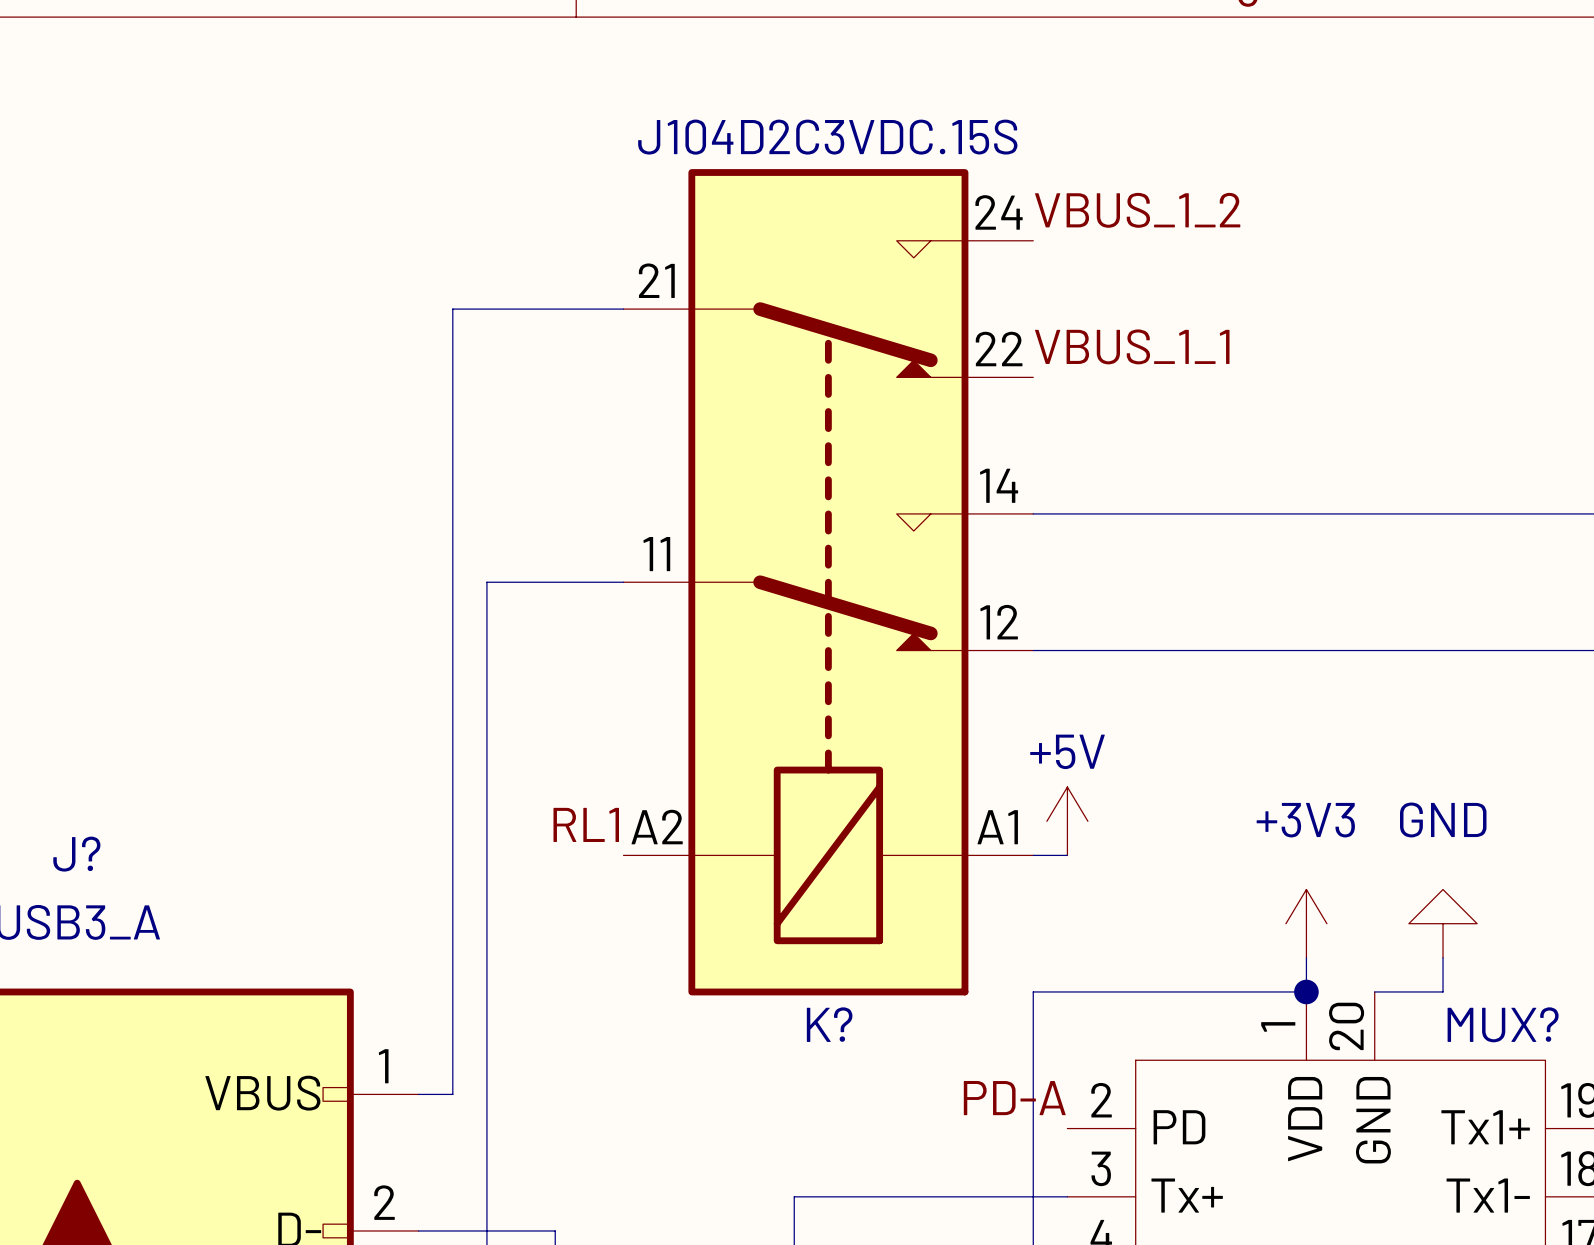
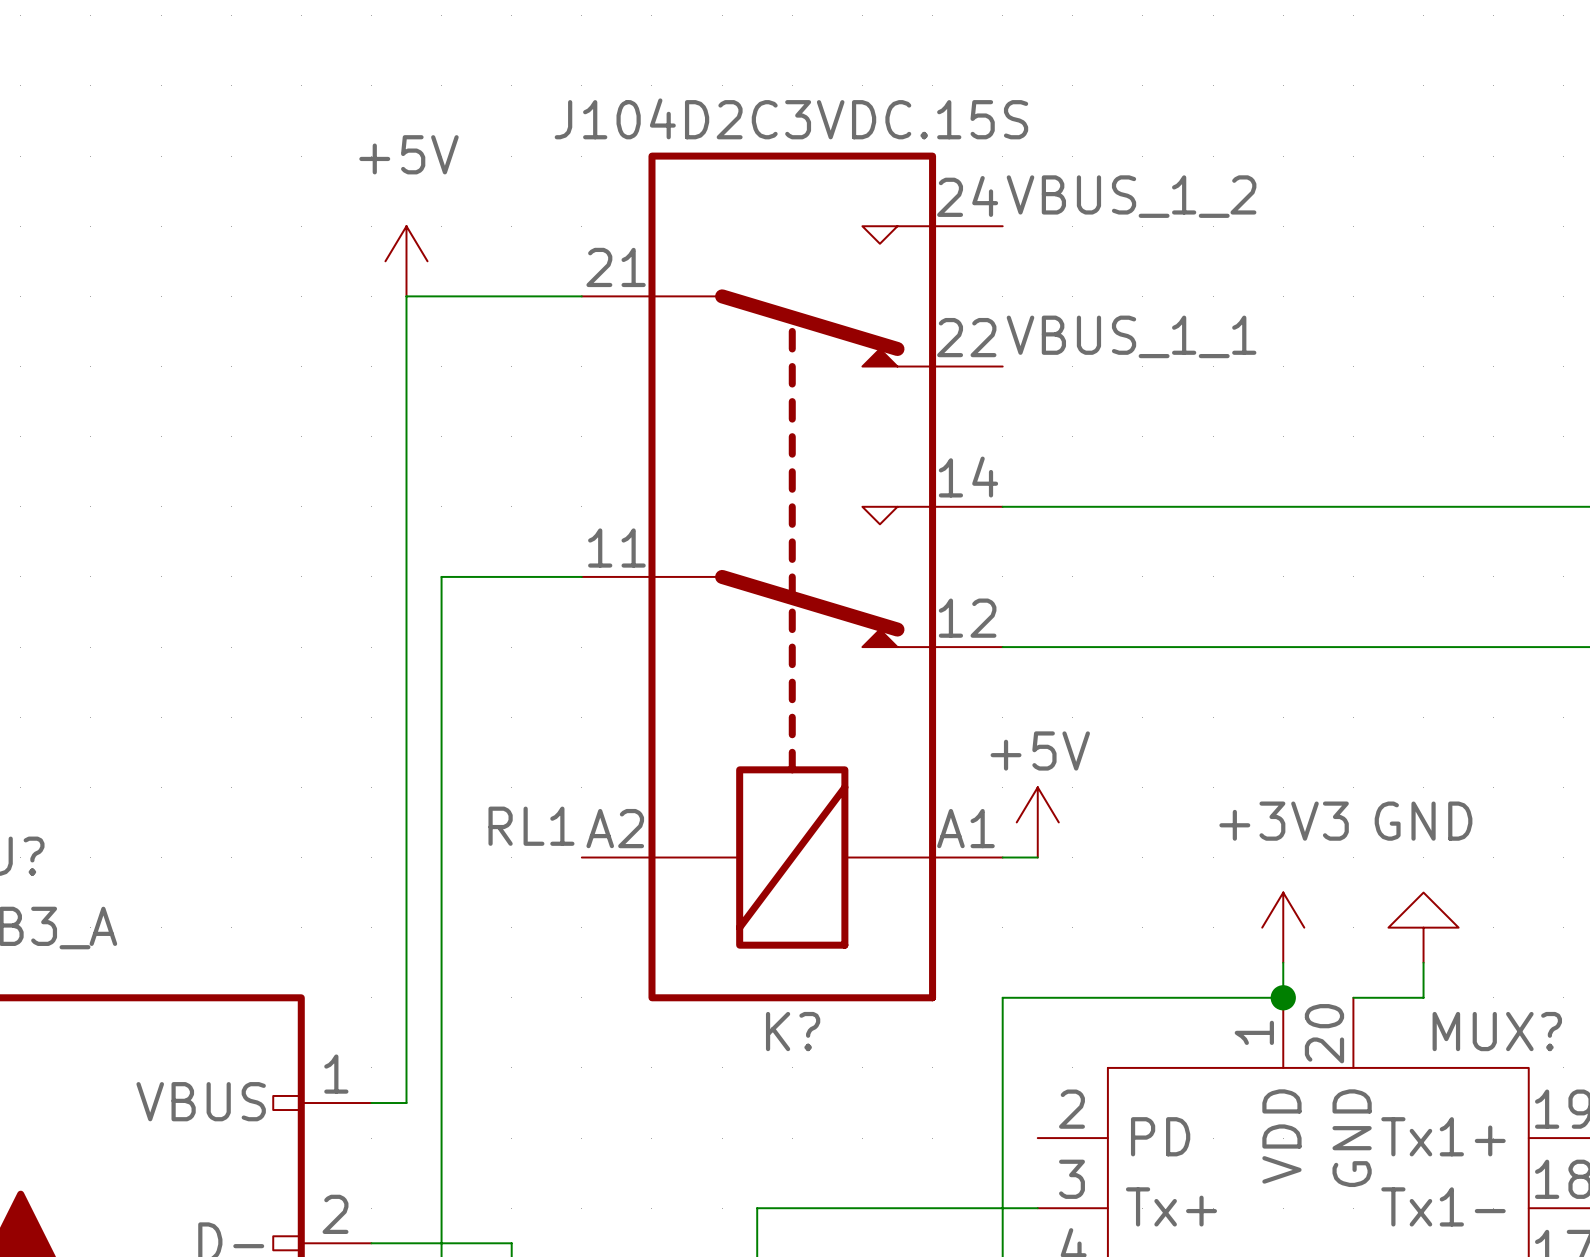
power symbol: none -> +5V (406, 261)
label: PD-A (1014, 1098) -> none

